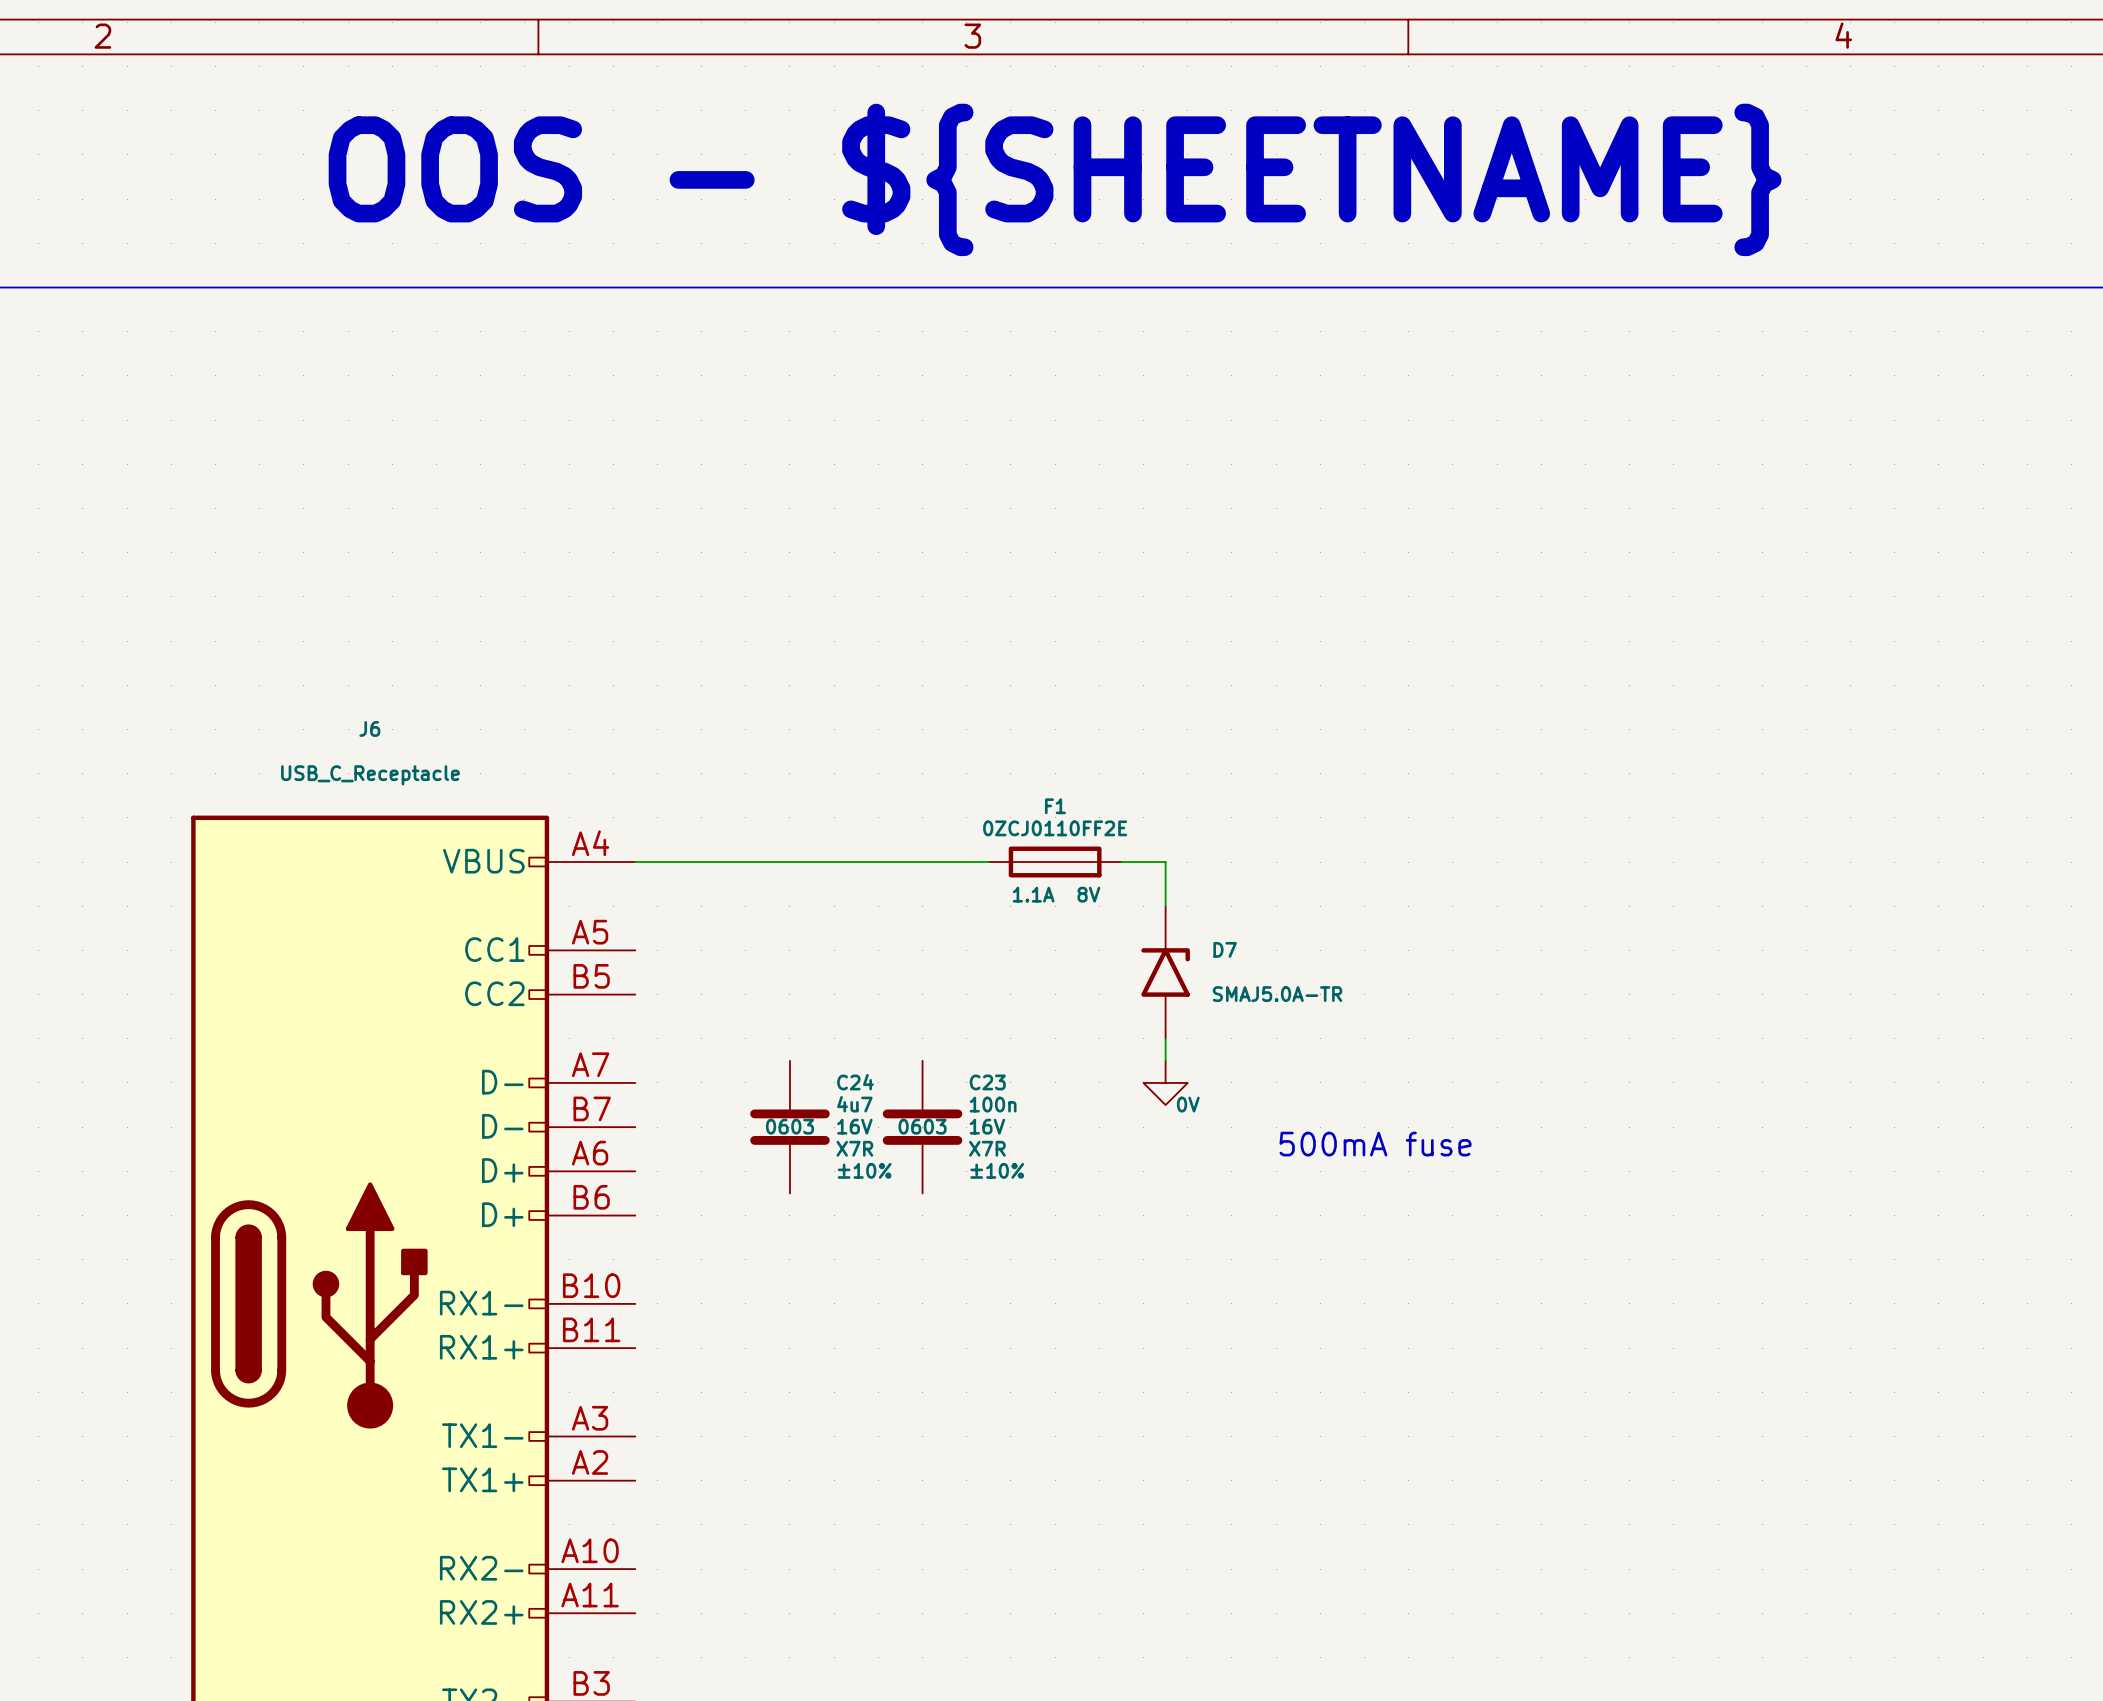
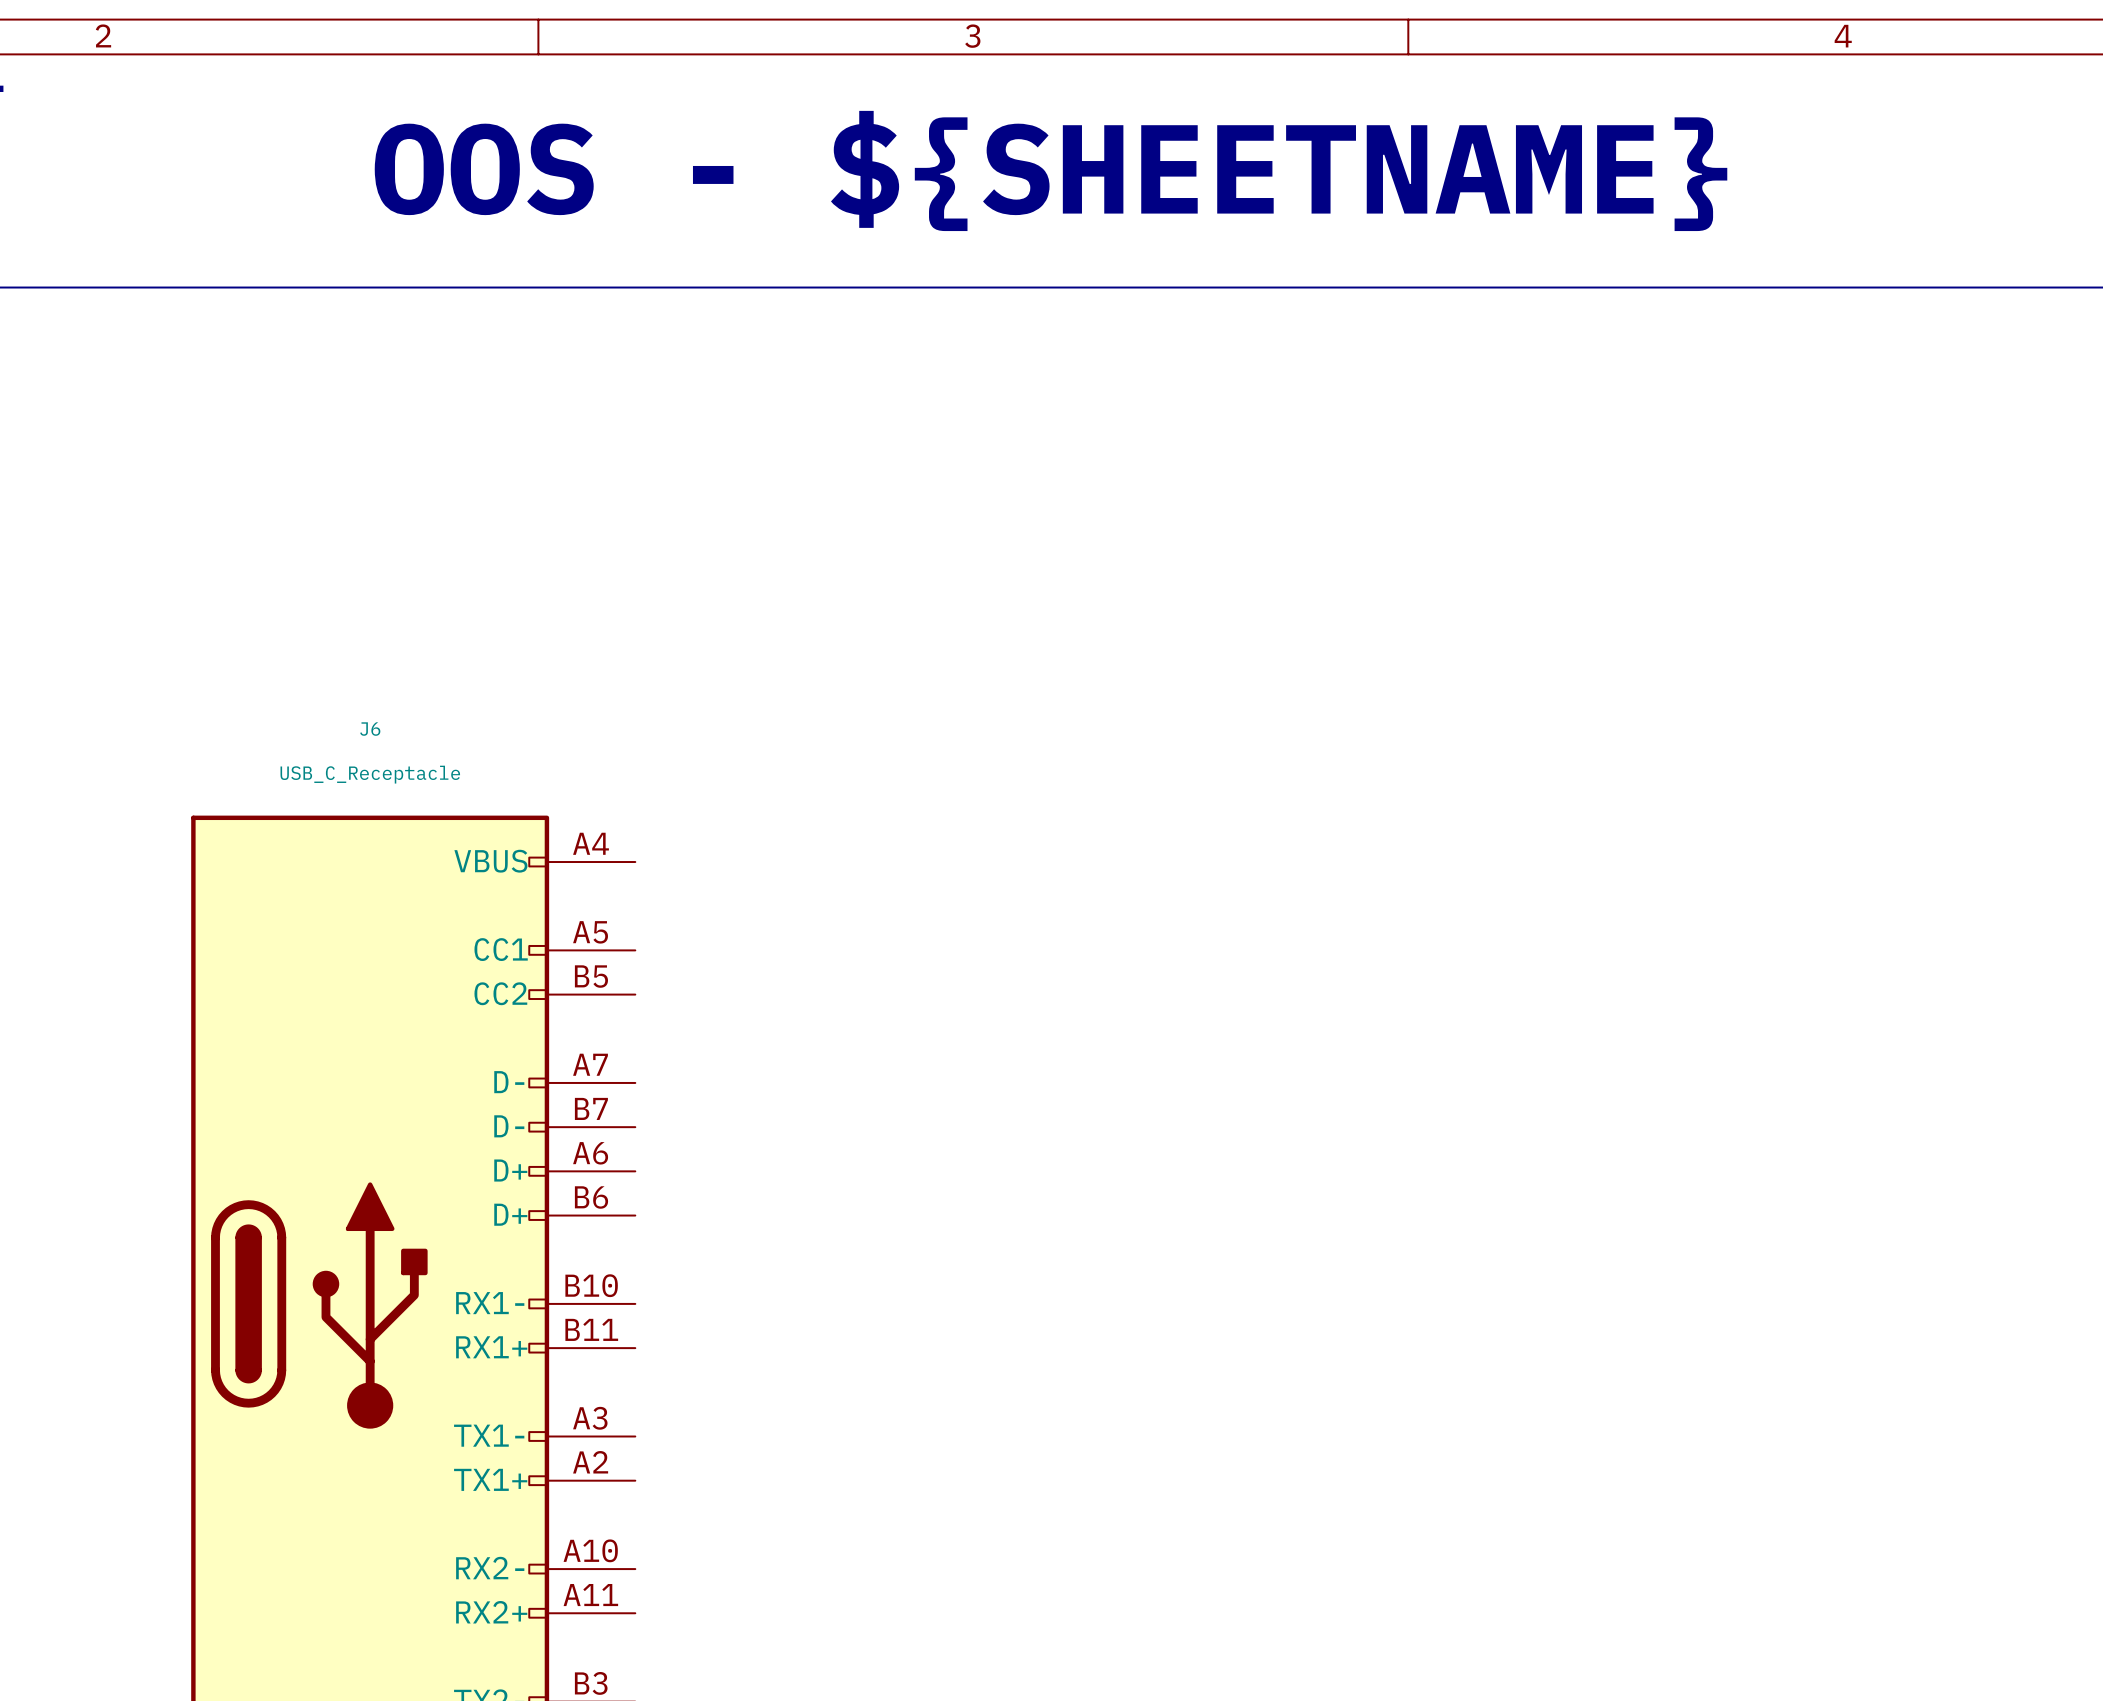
wire: (635, 862) (988, 862) -> none
F1: 0ZCJ0110FF2E (1055, 862) -> none
wire: (1121, 862) (1165, 862) (1165, 906) -> none
D7: SMAJ5.0A-TR (1165, 972) -> none
wire: (1165, 1038) (1165, 1060) -> none
power symbol: 0V (1165, 1082) -> none
C24: 4u7 (789, 1127) -> none
C23: 100n (922, 1127) -> none
text: 500mA fuse (1375, 1144) -> none

